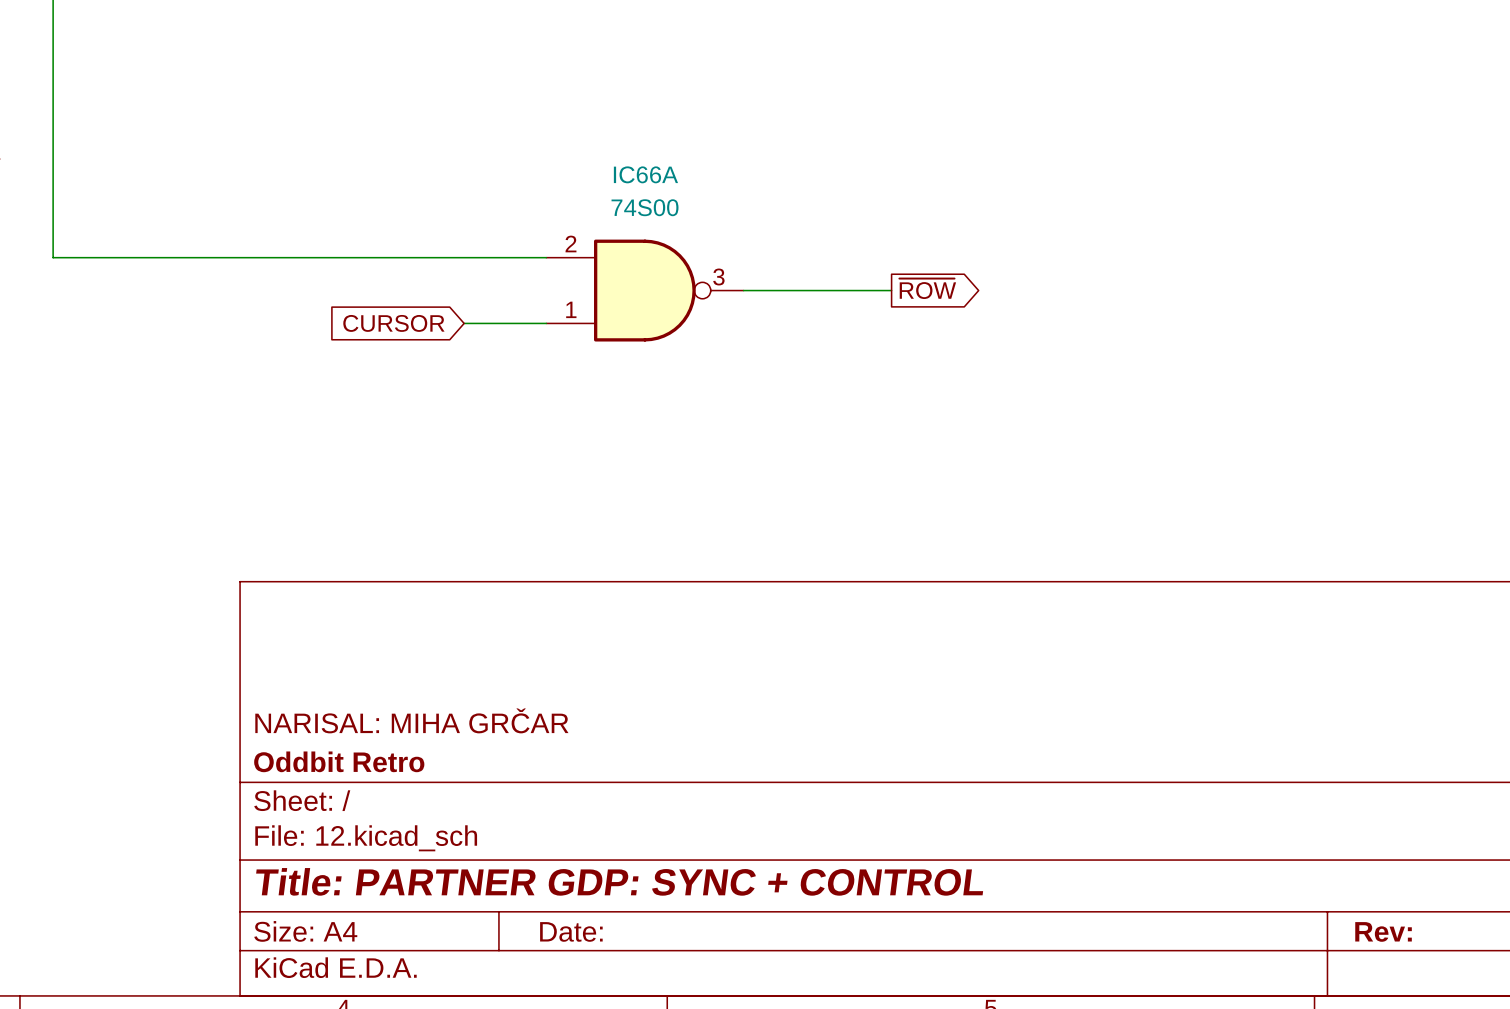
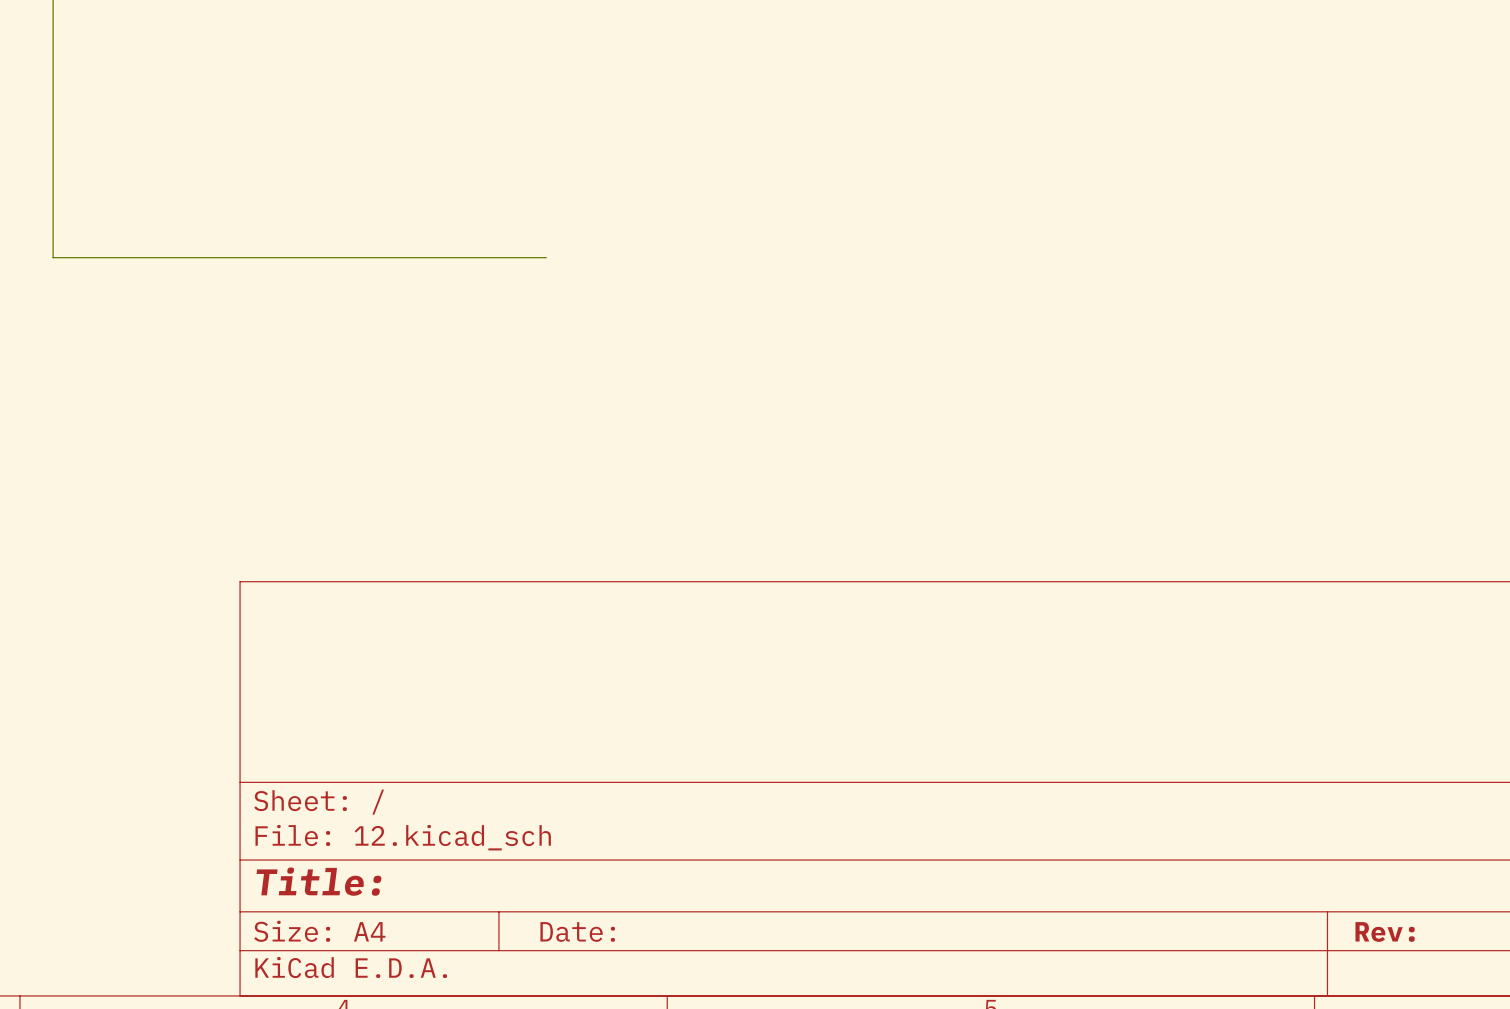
global label: ~{ROW} (927, 288) -> none
IC66A: 74S00 (644, 290) -> none
wire: (743, 290) (891, 290) -> none
global label: CURSOR (393, 323) -> none
wire: (464, 323) (546, 323) -> none
title block: NARISAL: MIHA GRČAR (411, 720) -> none
title block: Oddbit Retro (339, 761) -> none
title block: Title: PARTNER GDP: SYNC + CONTROL (619, 881) -> Title: (319, 881)

